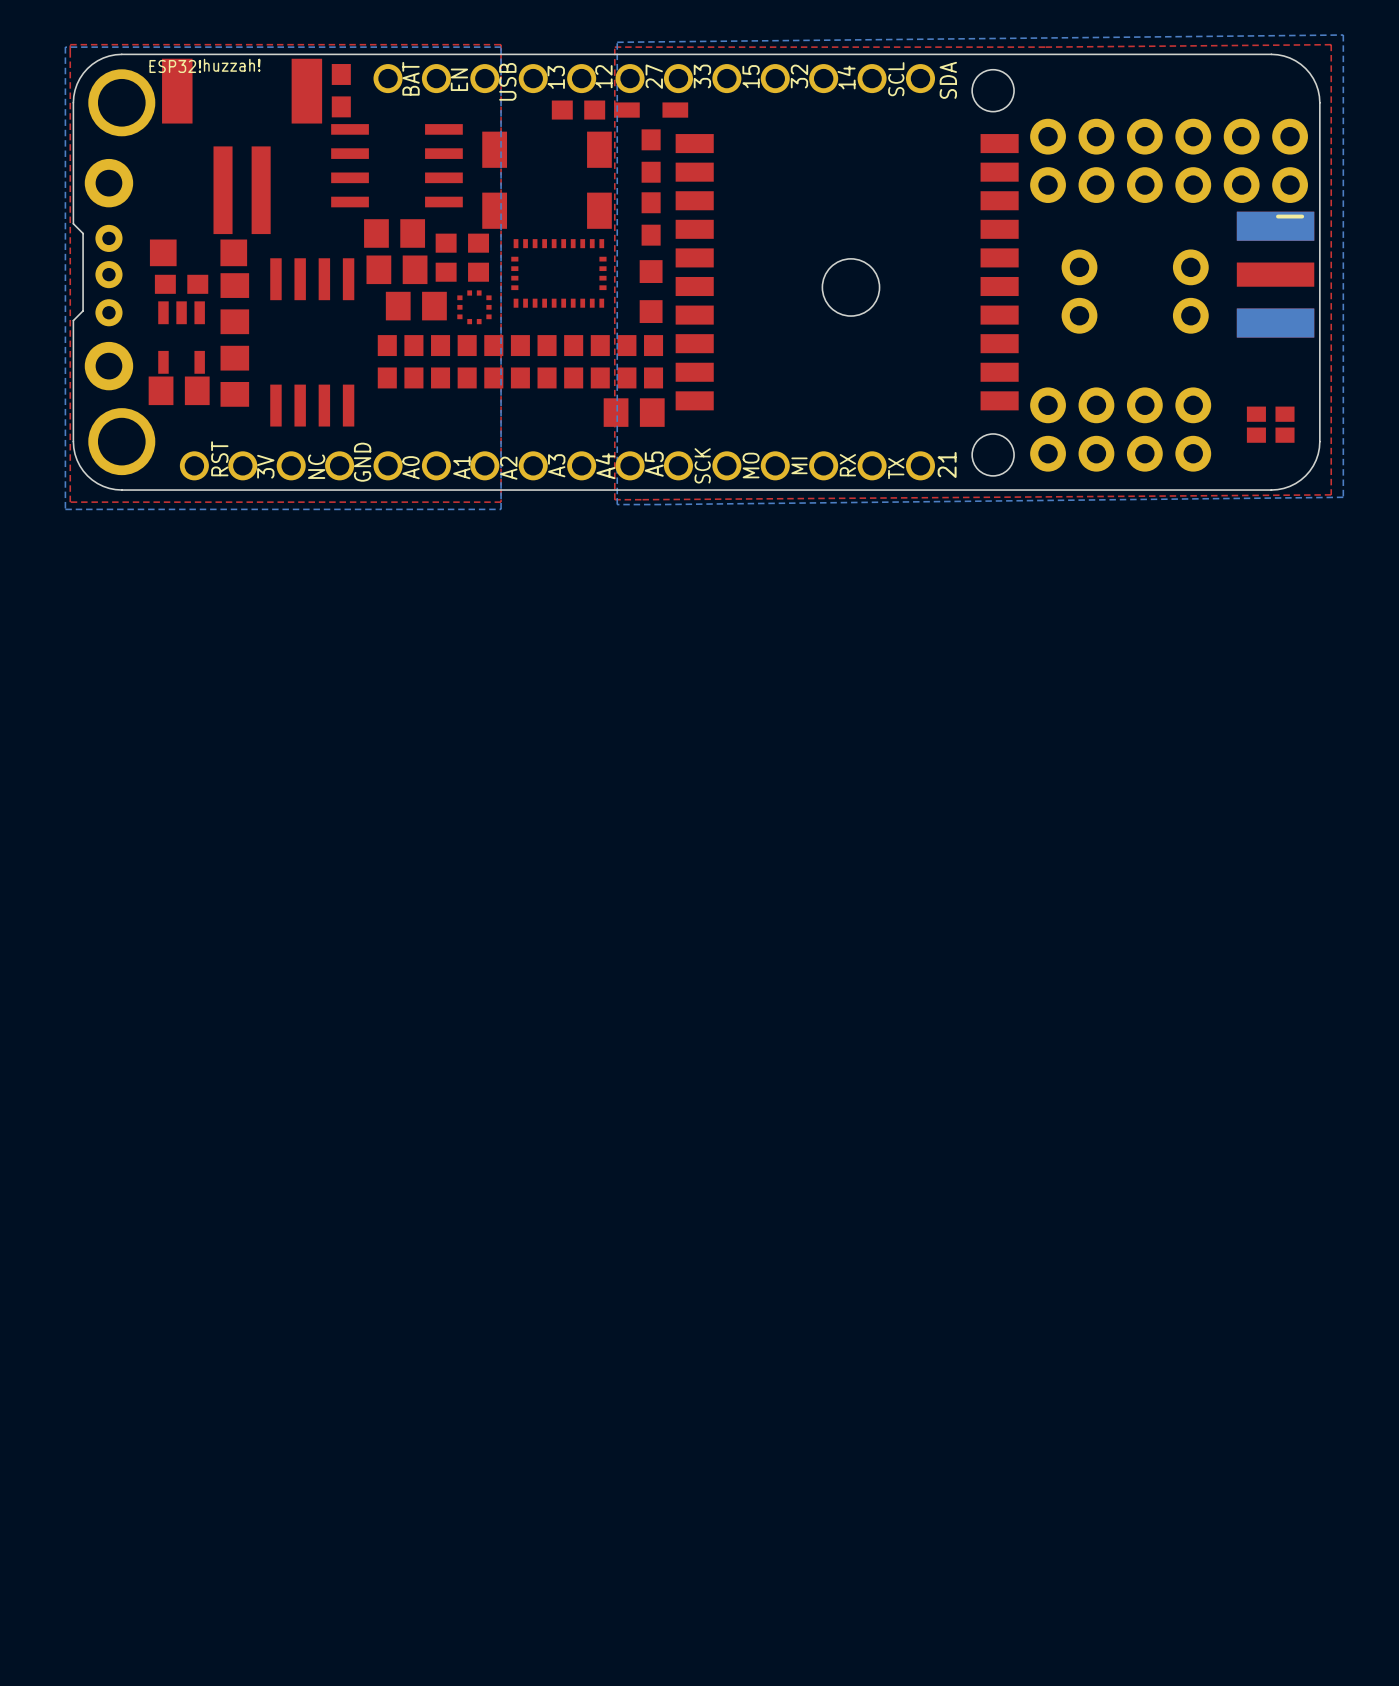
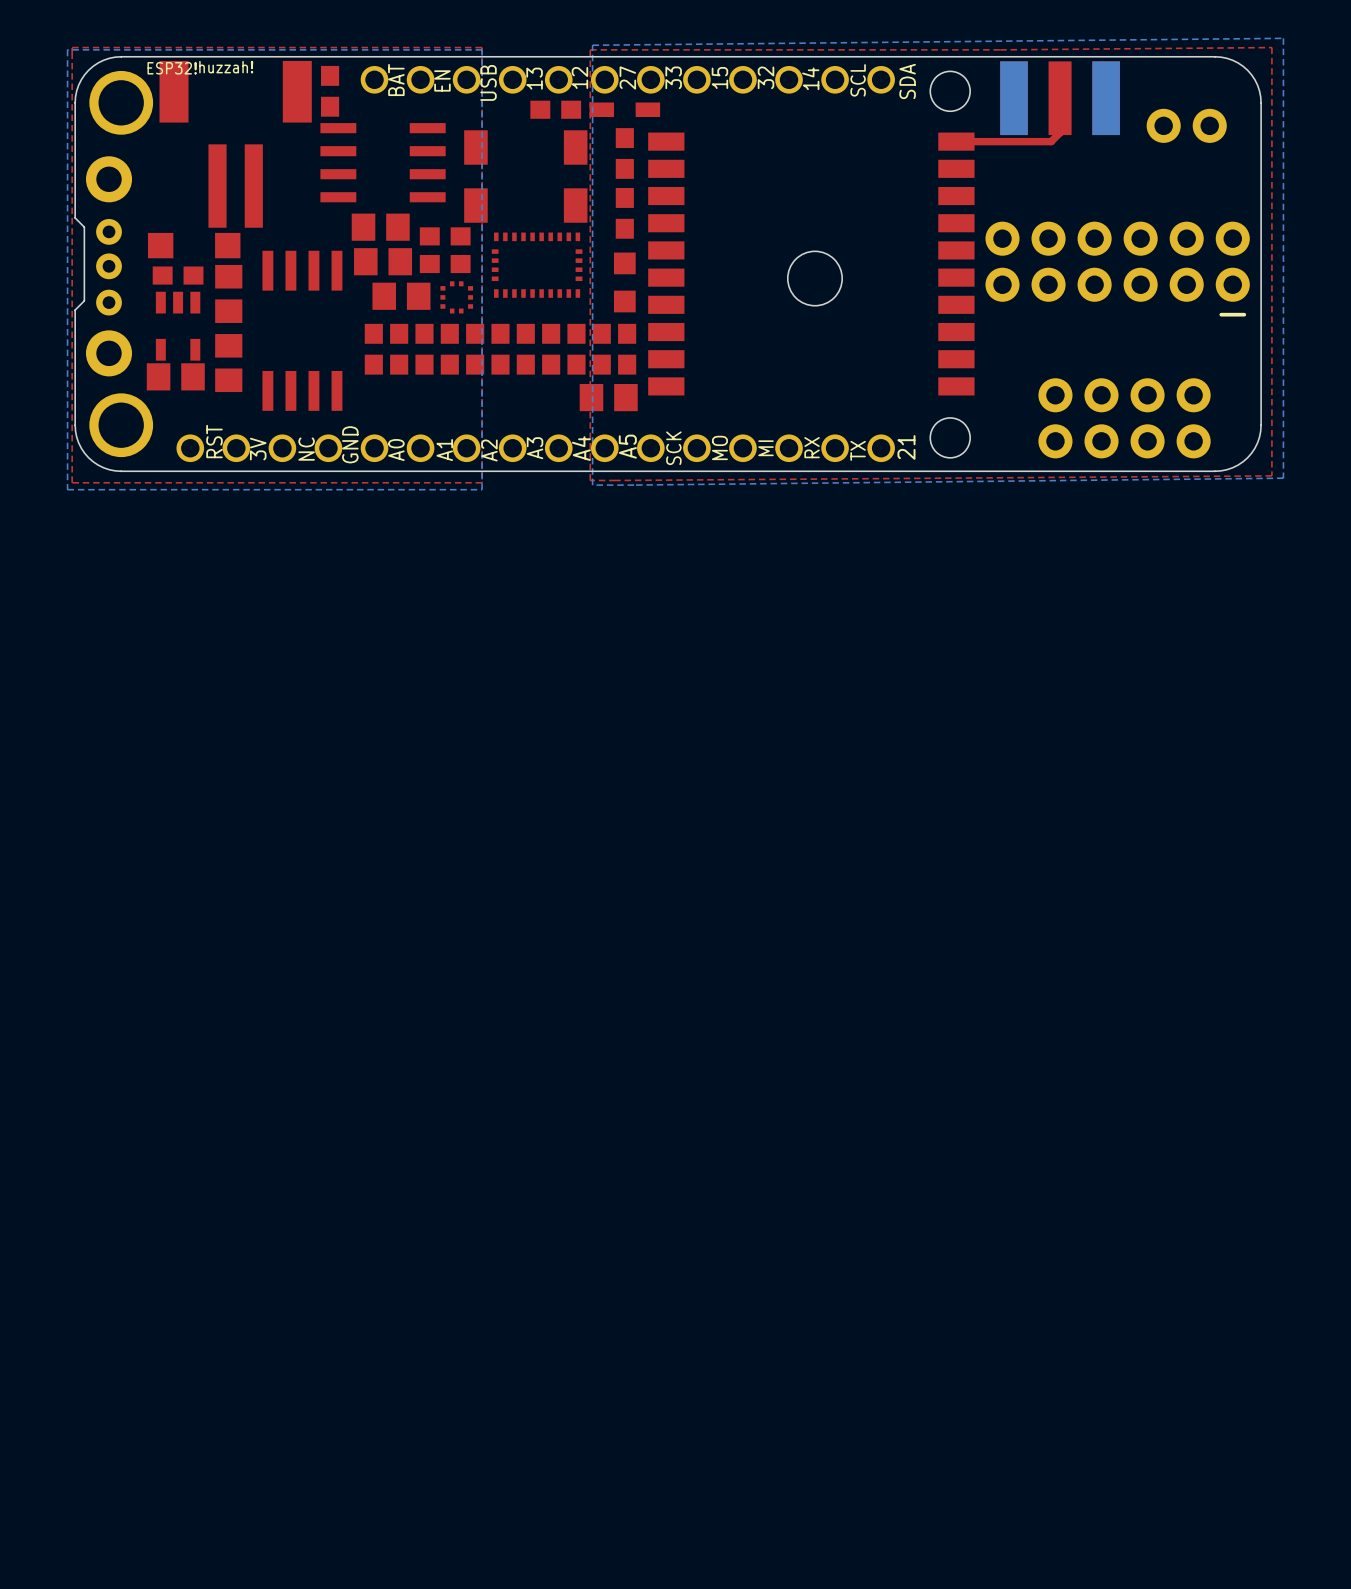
top track: none -> (1060, 98) (1060, 132) (1051, 141) (956, 141)
part: none -> (1186, 125)
part position: (1169, 168) -> (1117, 269)
part rotation: 0° (1275, 274) -> 90° clockwise (1060, 98)
part position: (1275, 274) -> (1060, 98)
part: (1079, 291) -> none
part: (1190, 291) -> none
part: (1120, 405) -> none
part: none -> (1124, 395)
part: (1270, 424) -> none
part: (1120, 453) -> none
part: none -> (1124, 441)

